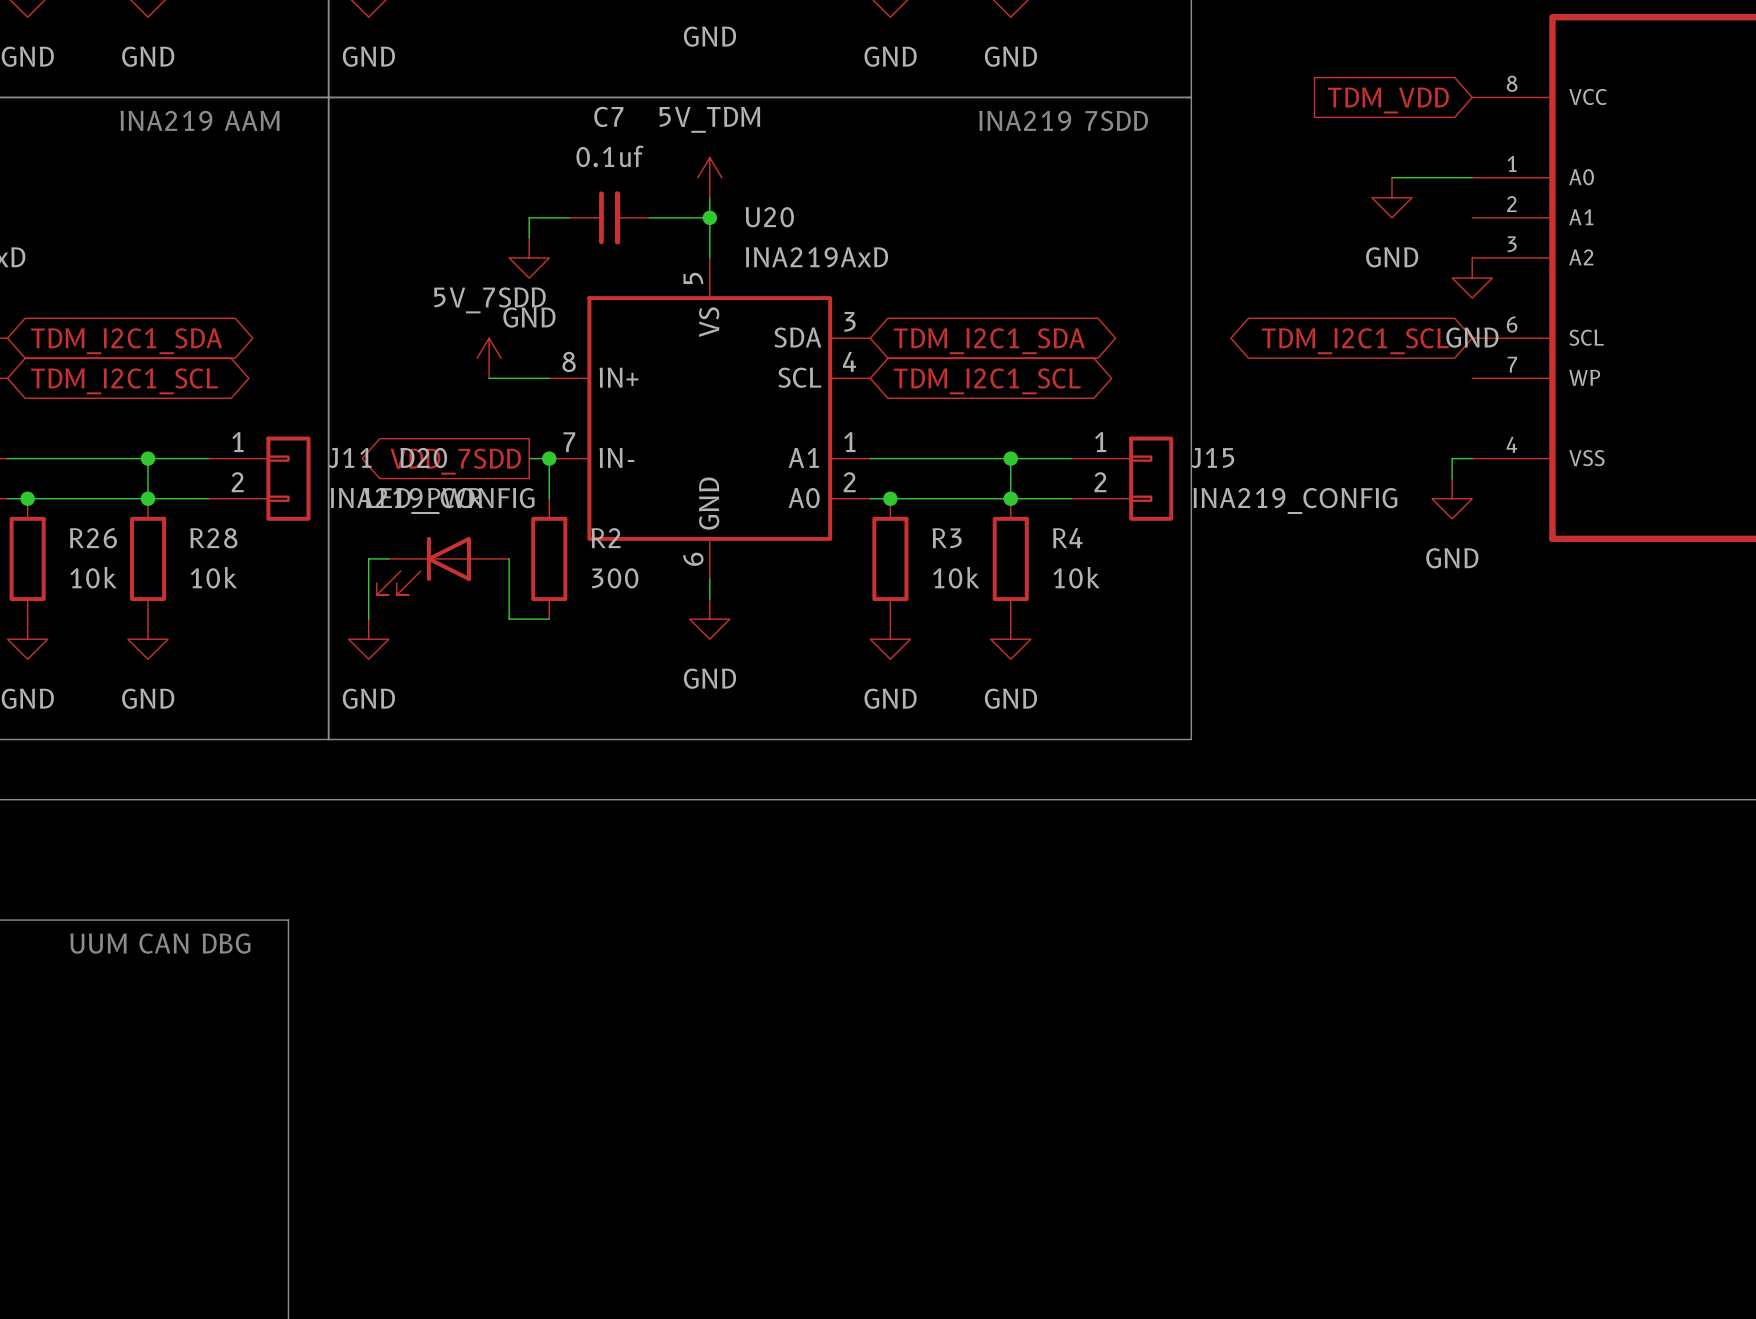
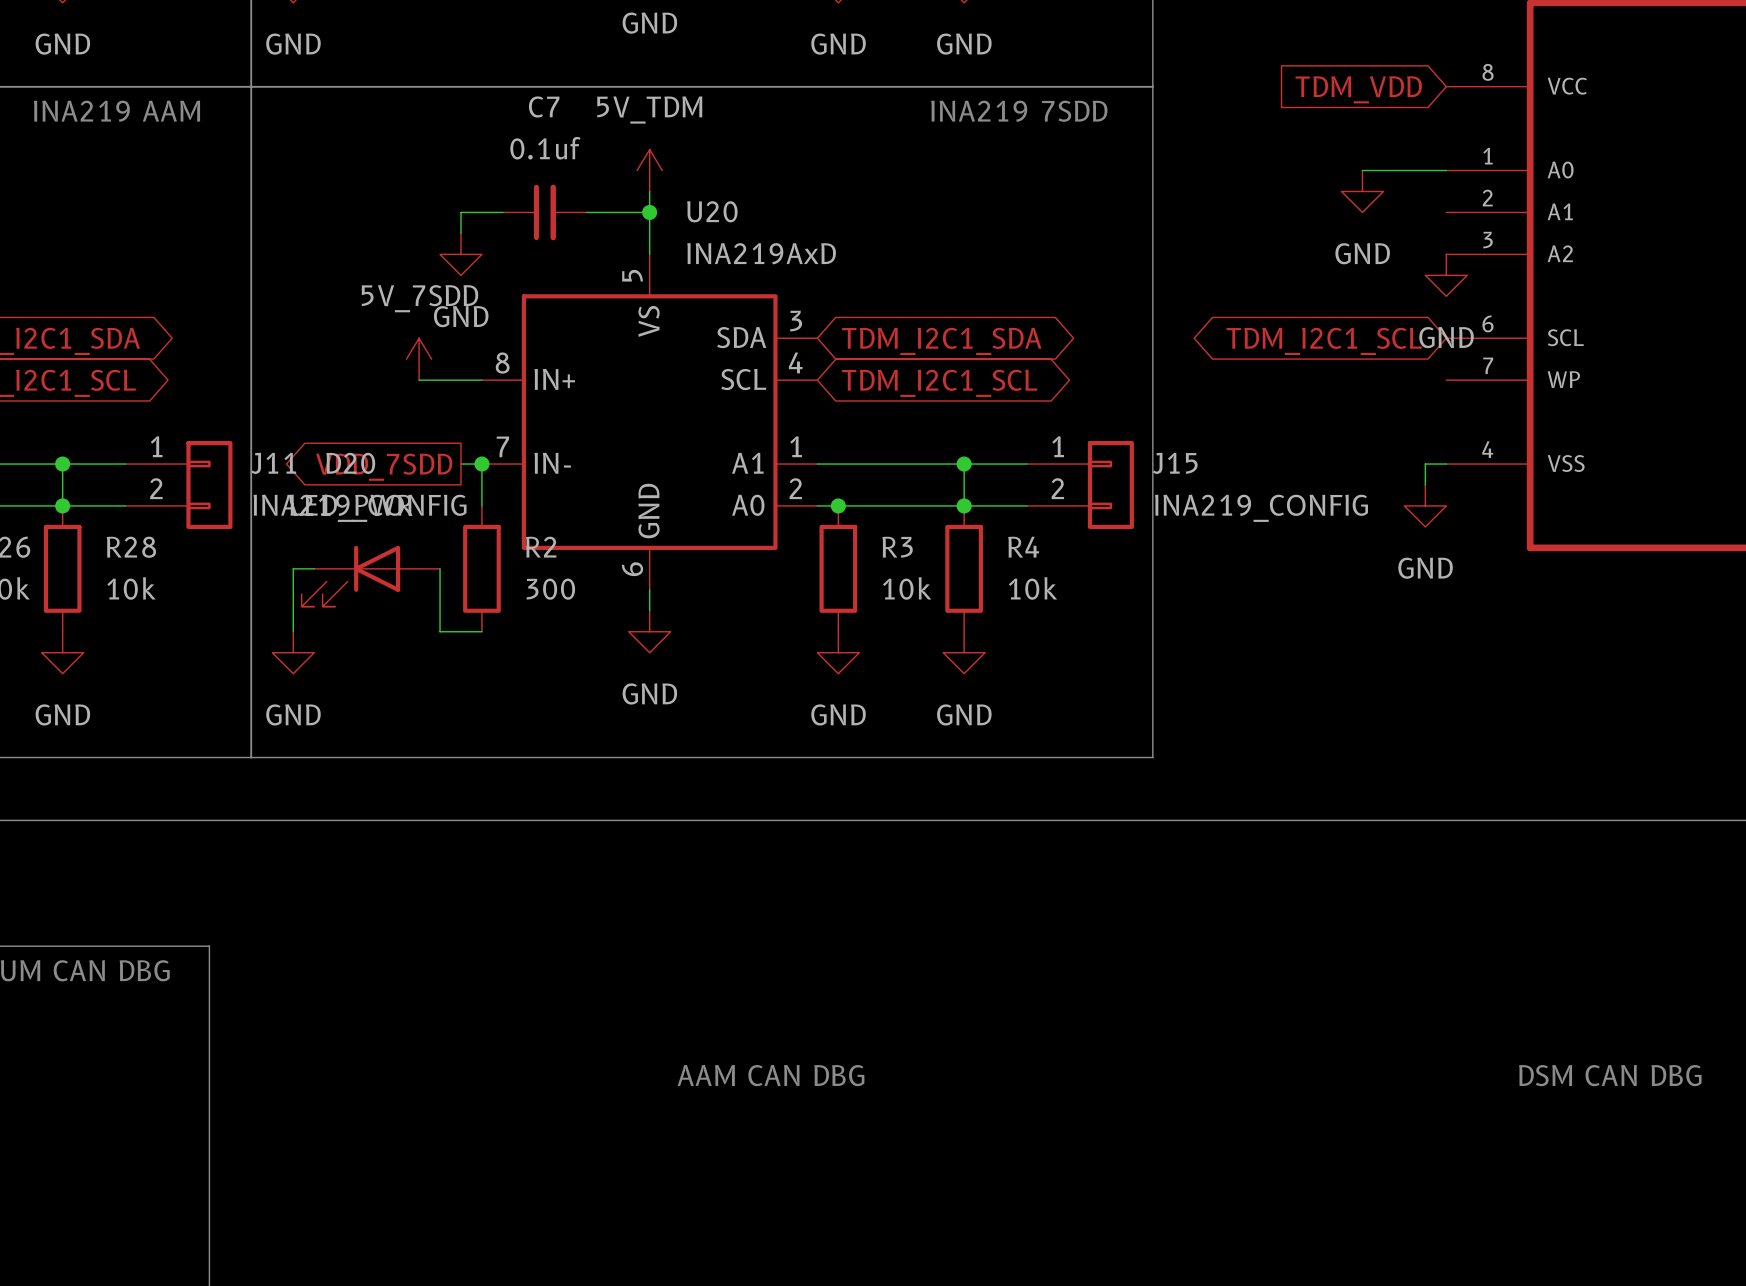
text: none -> AAM CAN DBG (771, 1075)
text: none -> DSM CAN DBG (1610, 1075)

